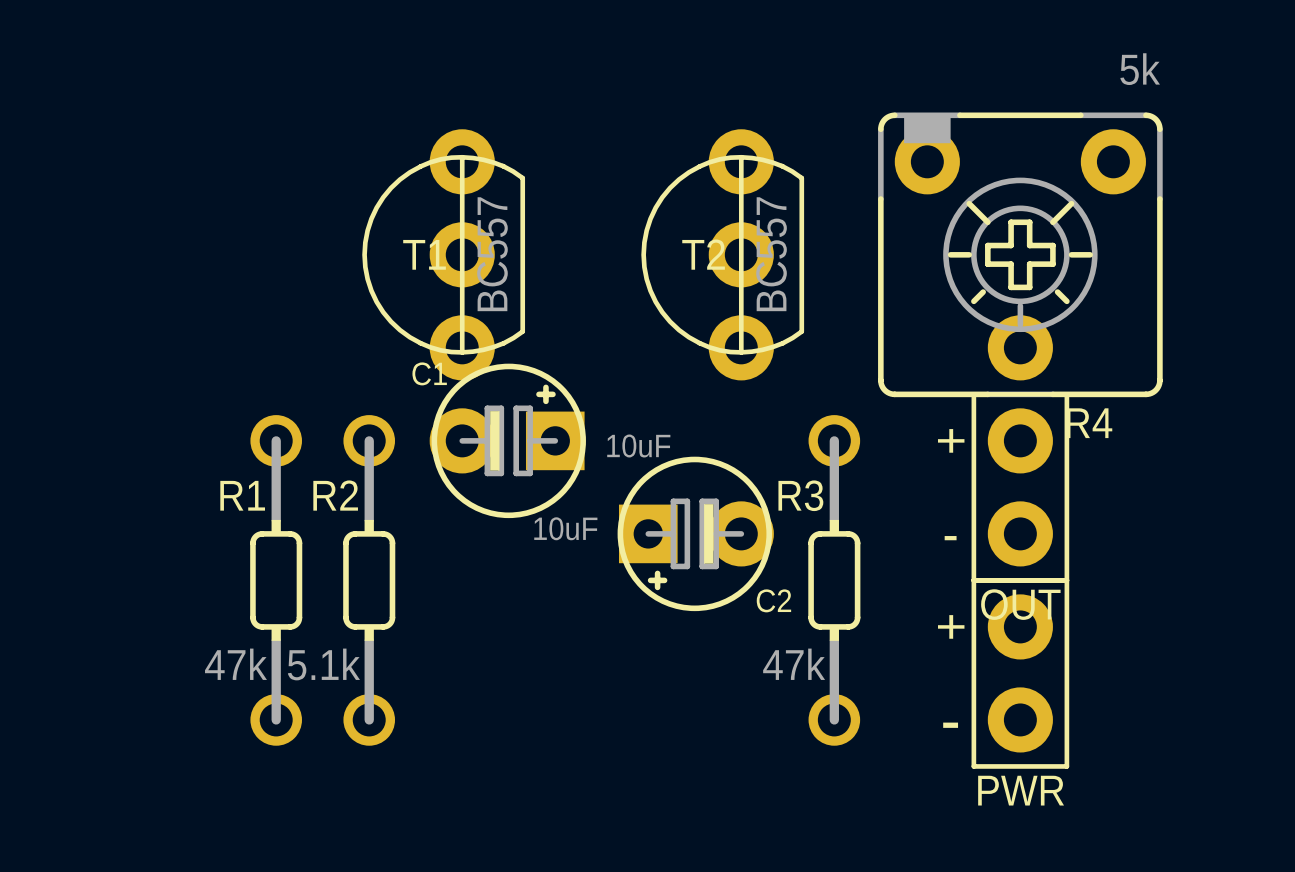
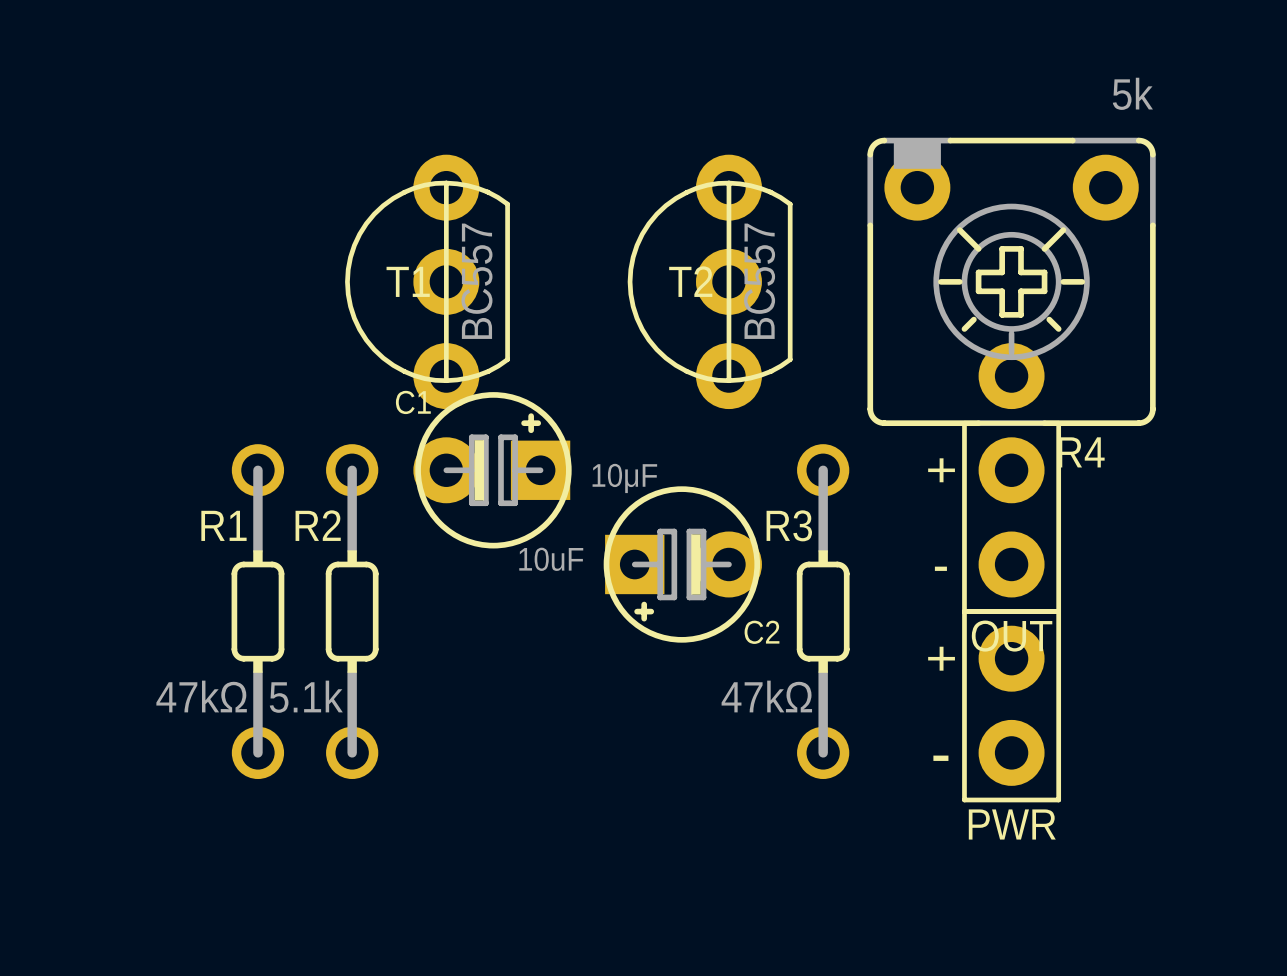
C2 value: 10uF (638, 445) -> 10μF (624, 478)
R1 value: 47k (235, 664) -> 47kΩ (201, 696)
R3 value: 47k (794, 664) -> 47kΩ (766, 696)

